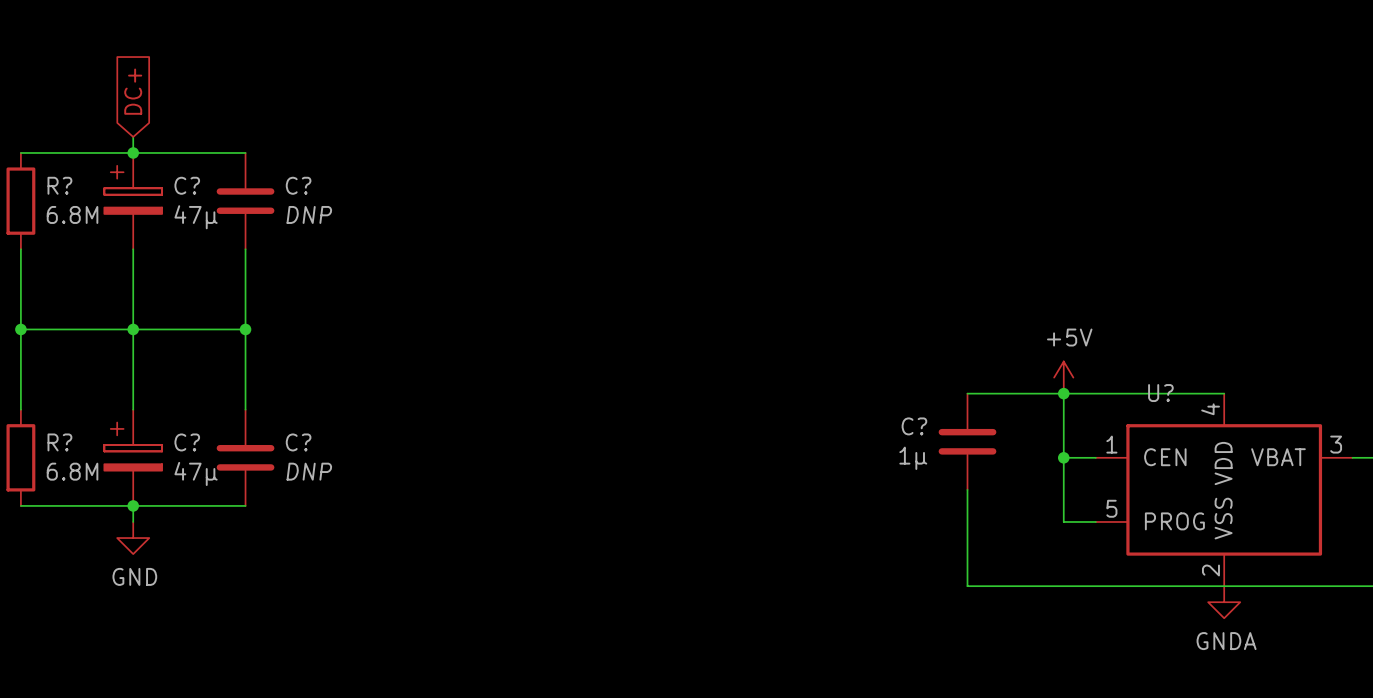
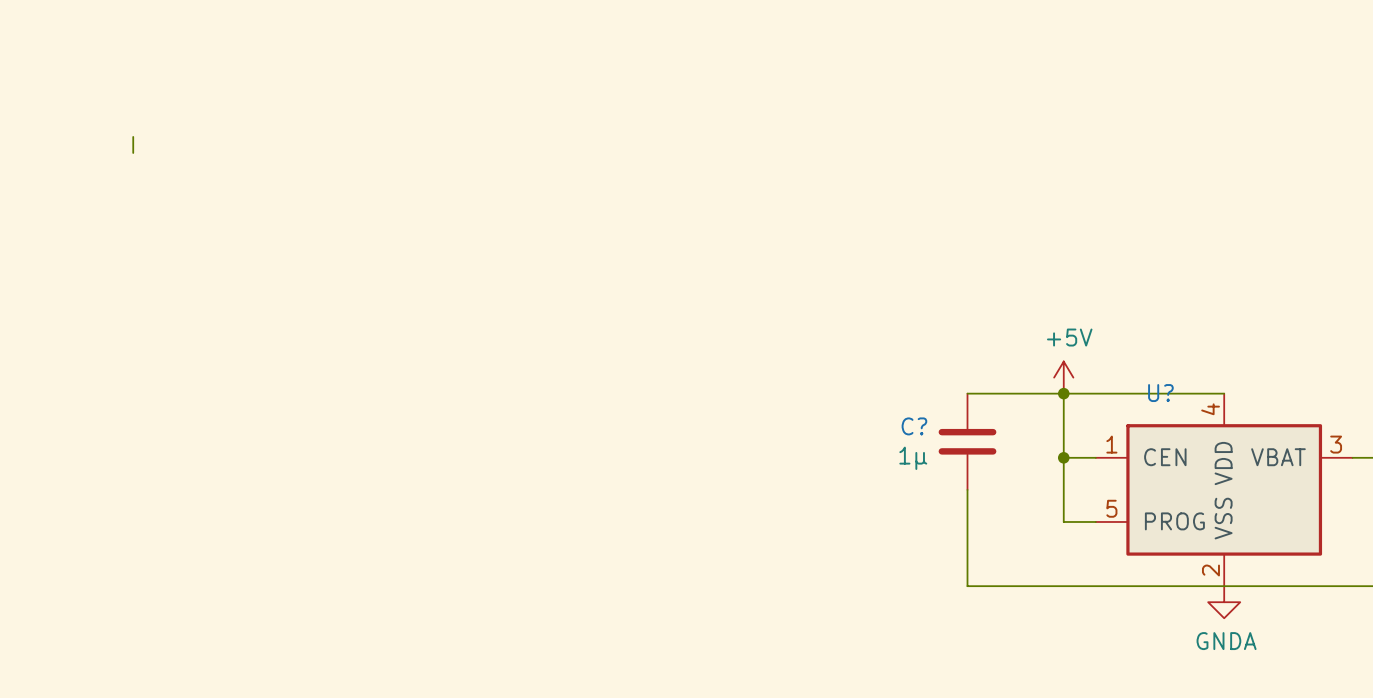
global label: DC+ (133, 91) -> none
wire: (20, 152) (245, 152) -> none
junction: (133, 152) -> none
R?: 6.8M (20, 201) -> none
C?: 47µ (133, 201) -> none
C?: DNP (245, 201) -> none
wire: (20, 249) (20, 409) -> none
wire: (133, 249) (133, 409) -> none
wire: (245, 249) (245, 409) -> none
wire: (20, 329) (245, 329) -> none
junction: (20, 329) -> none
junction: (133, 329) -> none
junction: (245, 329) -> none
R?: 6.8M (20, 457) -> none
C?: 47µ (133, 457) -> none
C?: DNP (245, 457) -> none
wire: (20, 505) (245, 505) -> none
wire: (133, 505) (133, 521) -> none
junction: (133, 505) -> none
power symbol: GND (133, 538) -> none

